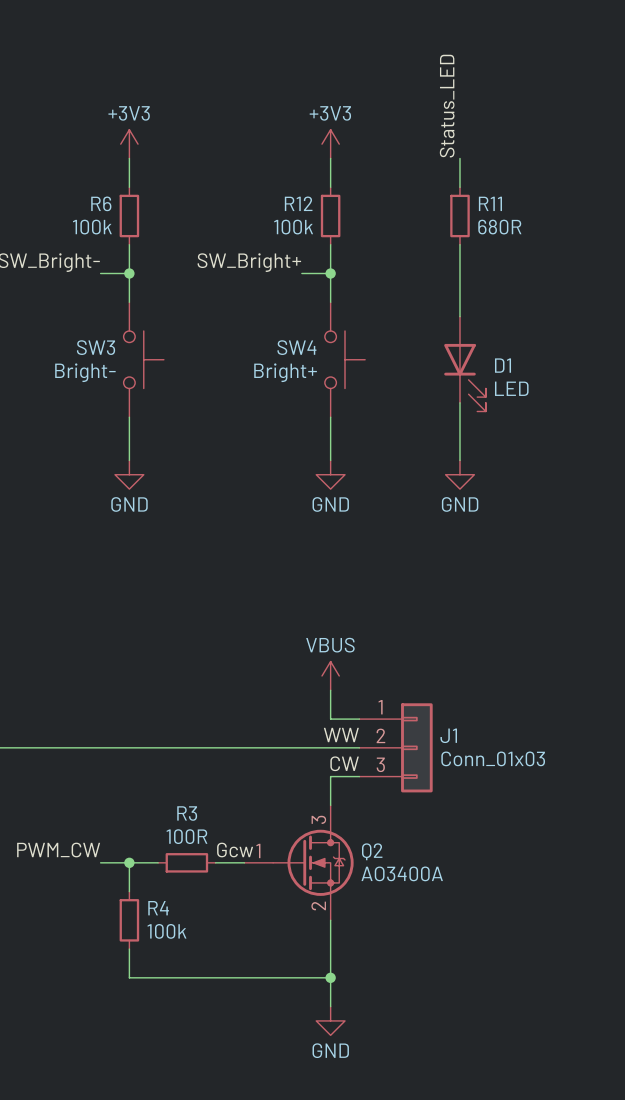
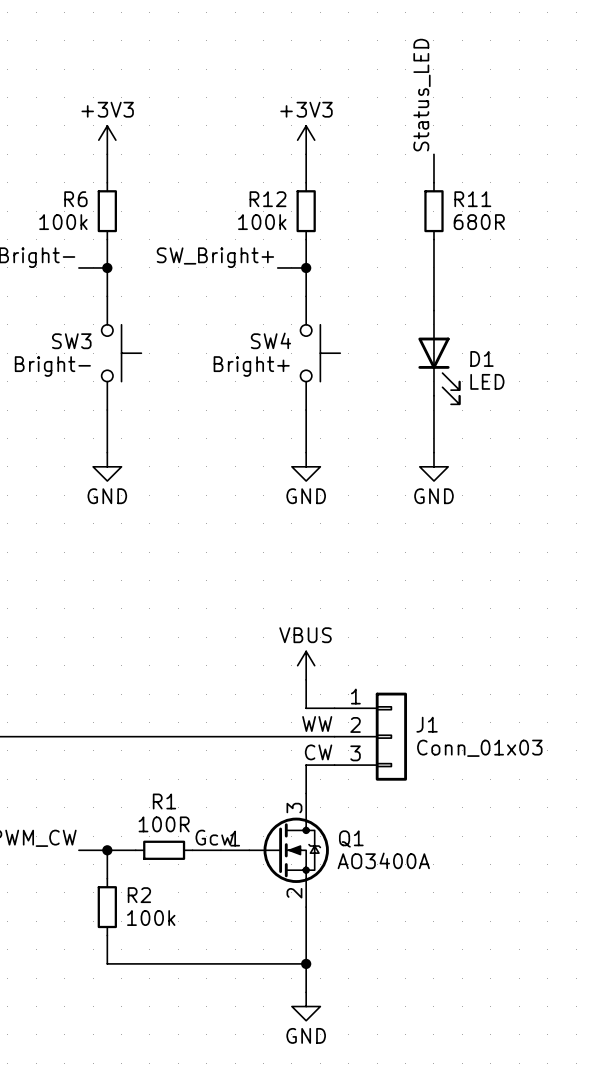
R3 name: R3 (187, 813) -> R1 (164, 801)
Q2 name: Q2 (372, 851) -> Q1 (351, 838)
R4 name: R4 (158, 908) -> R2 (139, 895)

